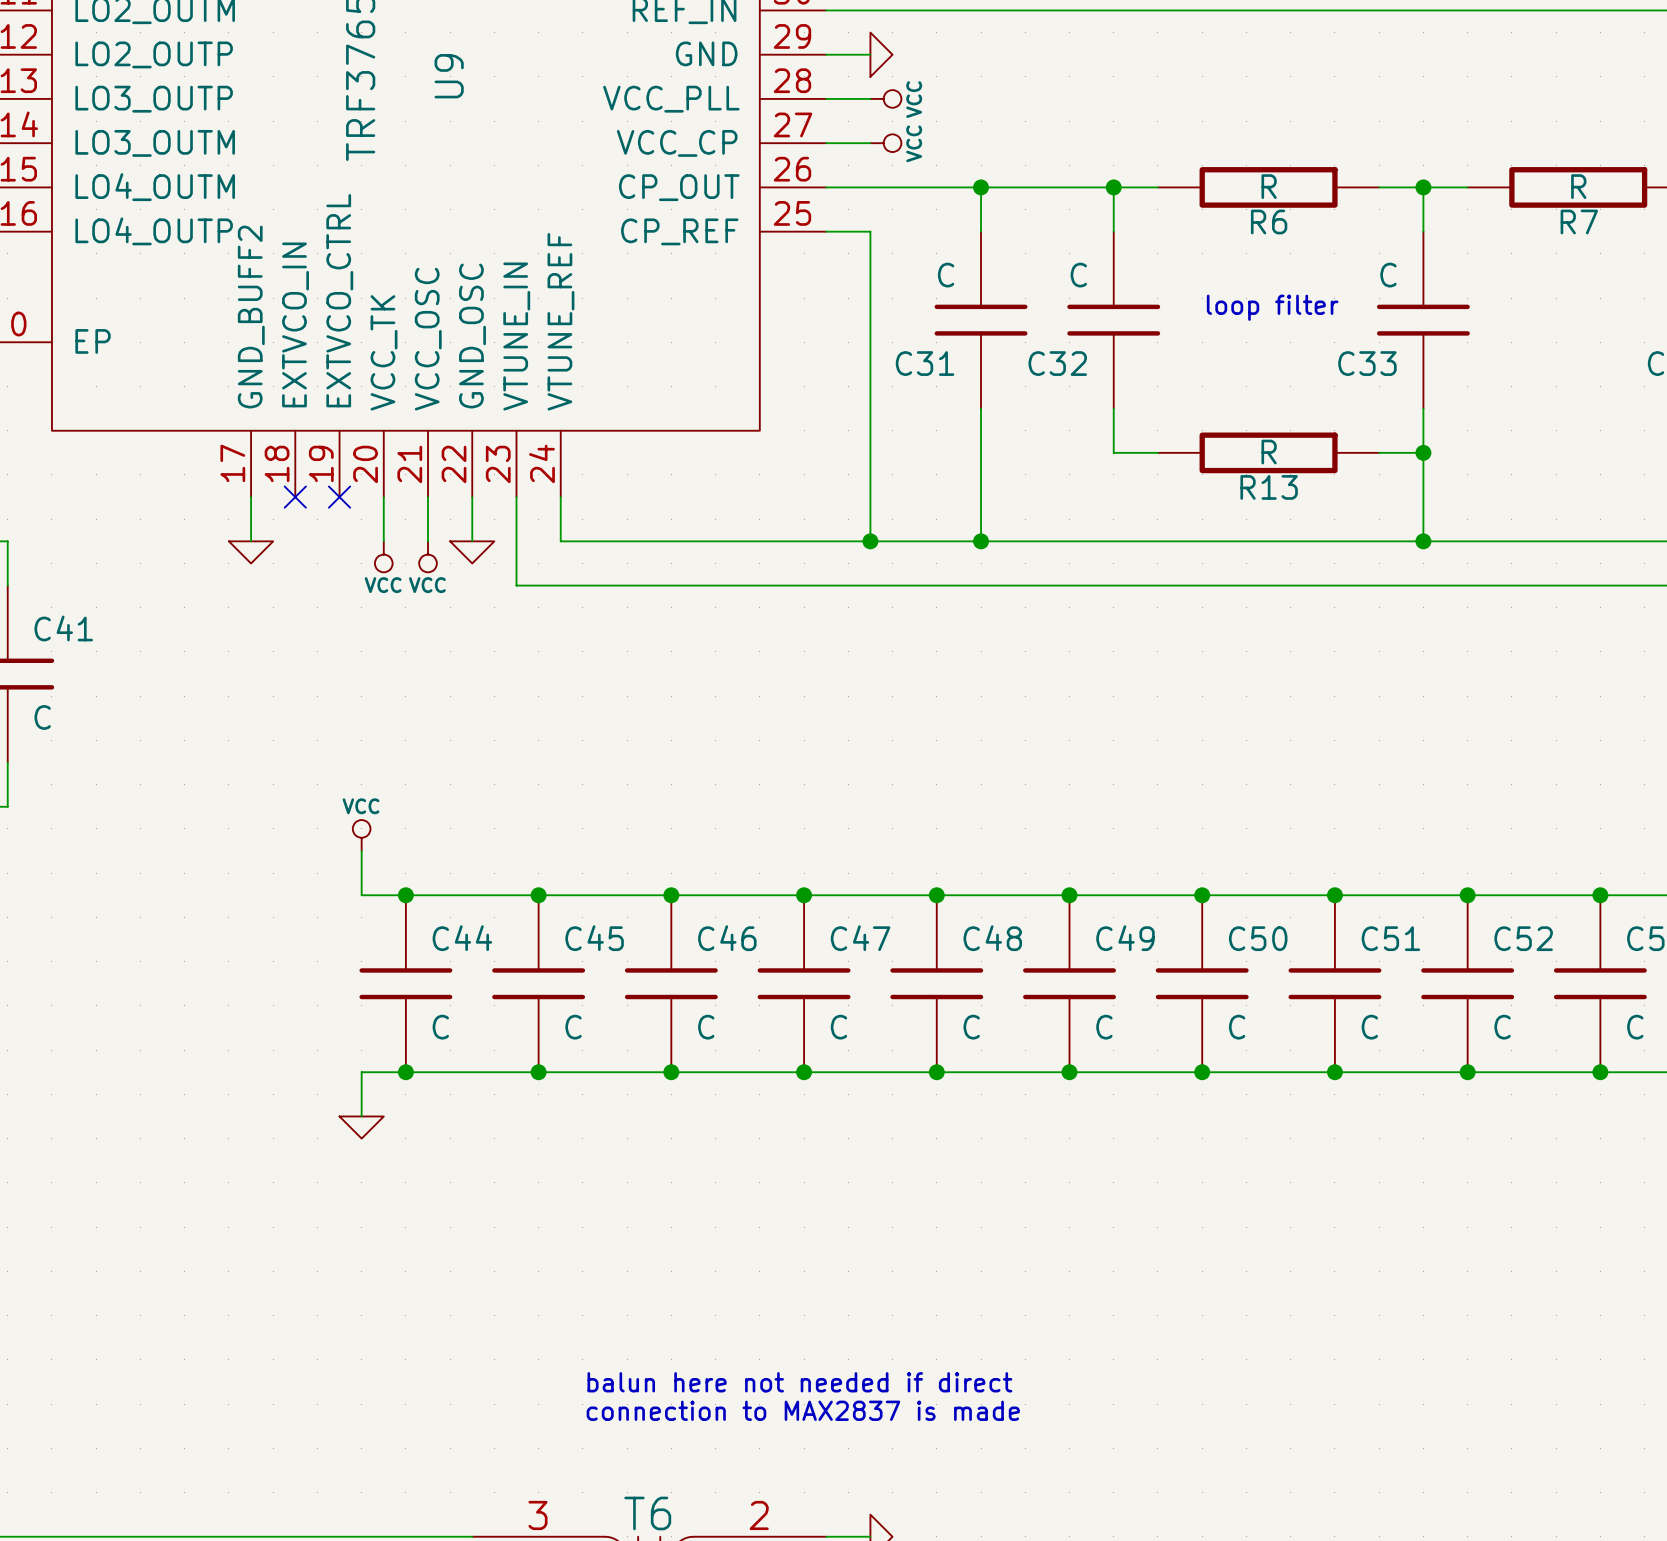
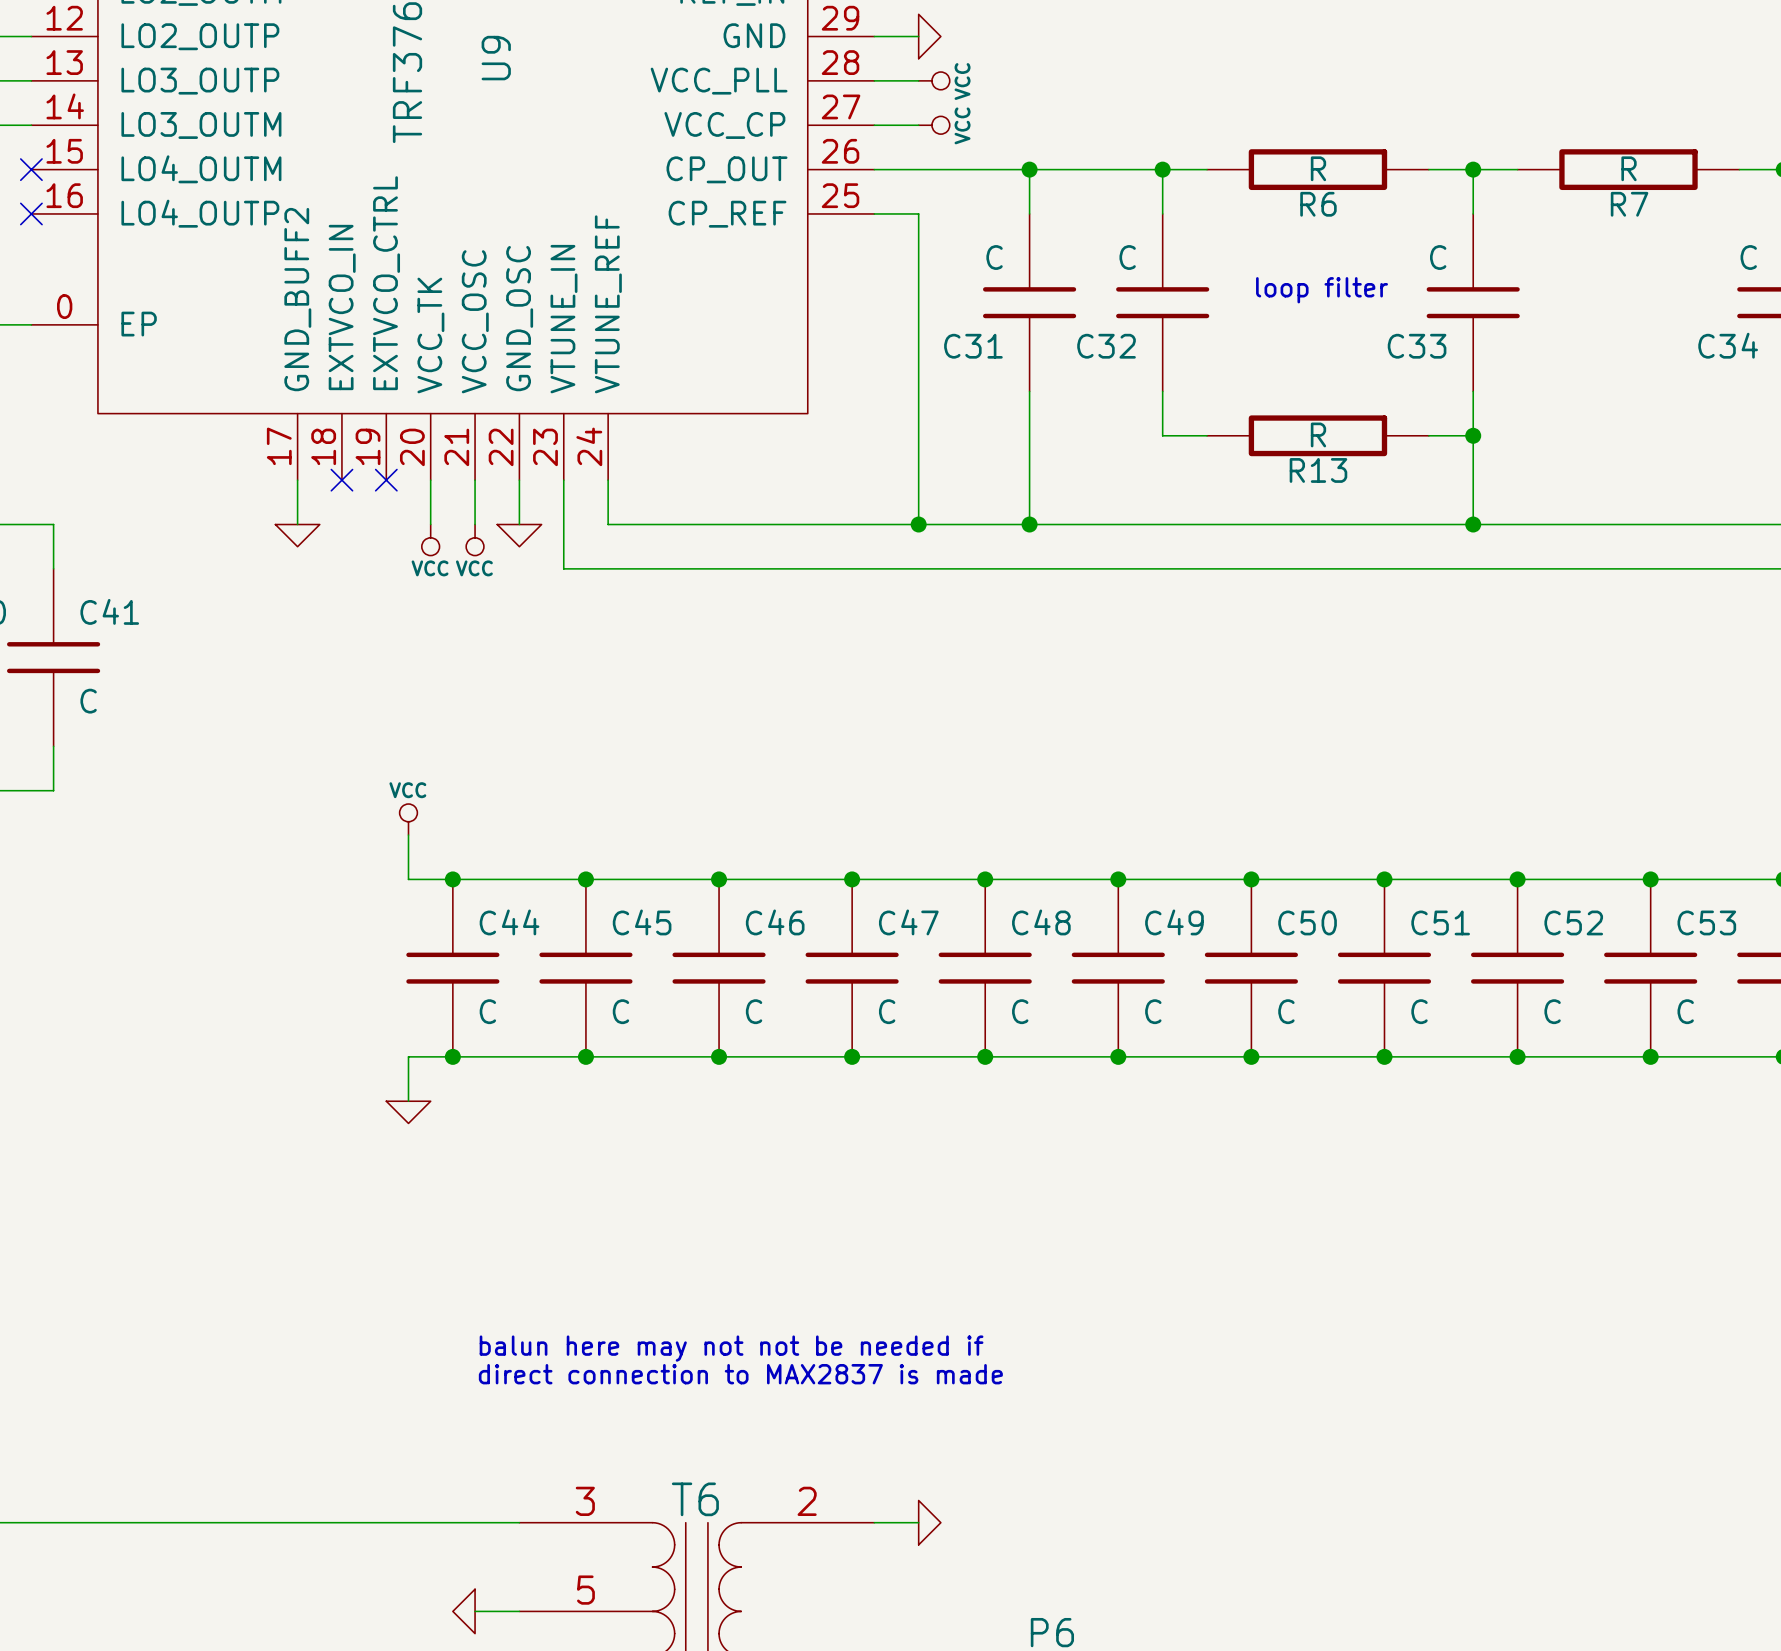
text: balun here not needed if direct (799, 1382) -> balun here may not not be needed if (731, 1348)
text: connection to MAX2837 is made (803, 1410) -> direct connection to MAX2837 is made (740, 1374)

